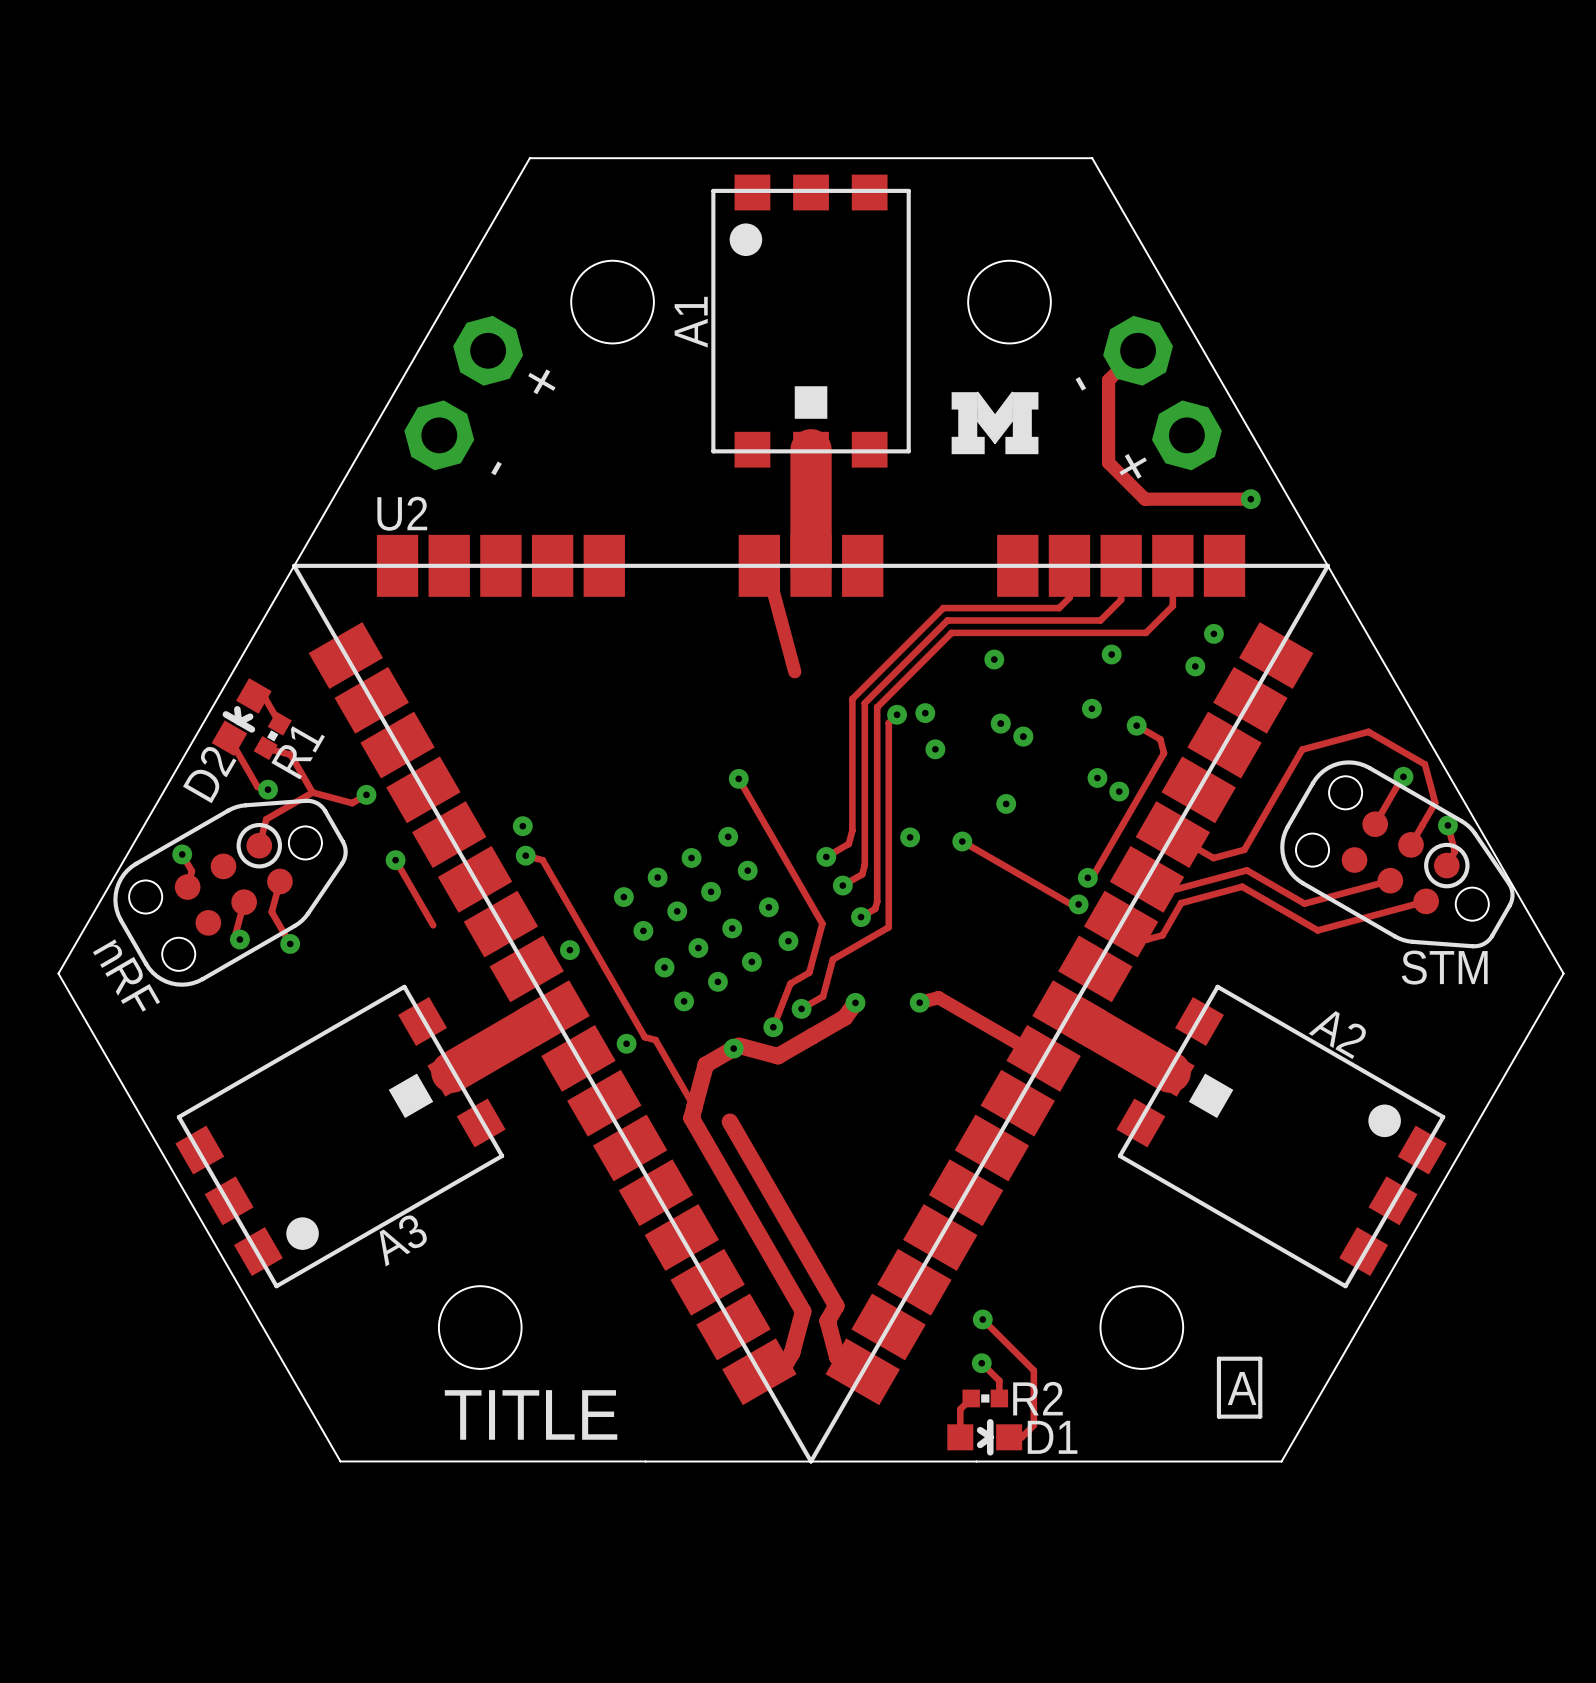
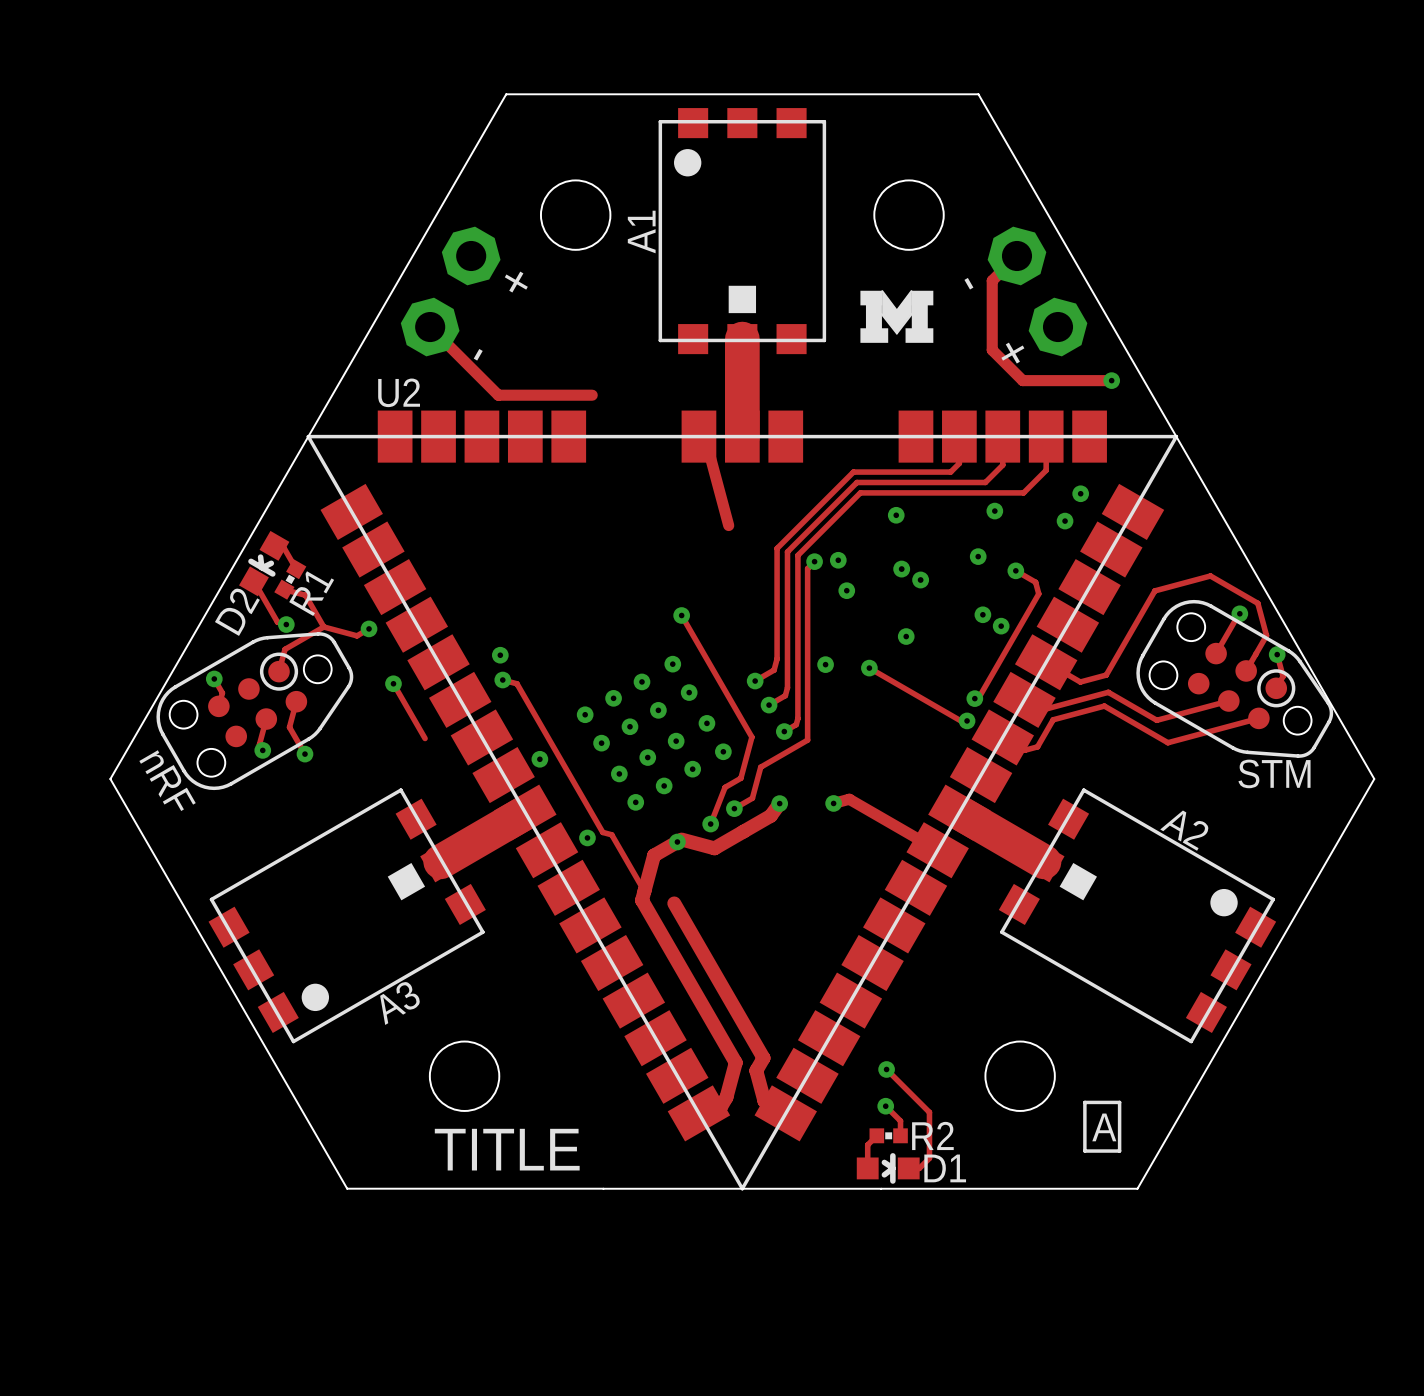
track: none -> (430, 327) (498, 395) (592, 395)

